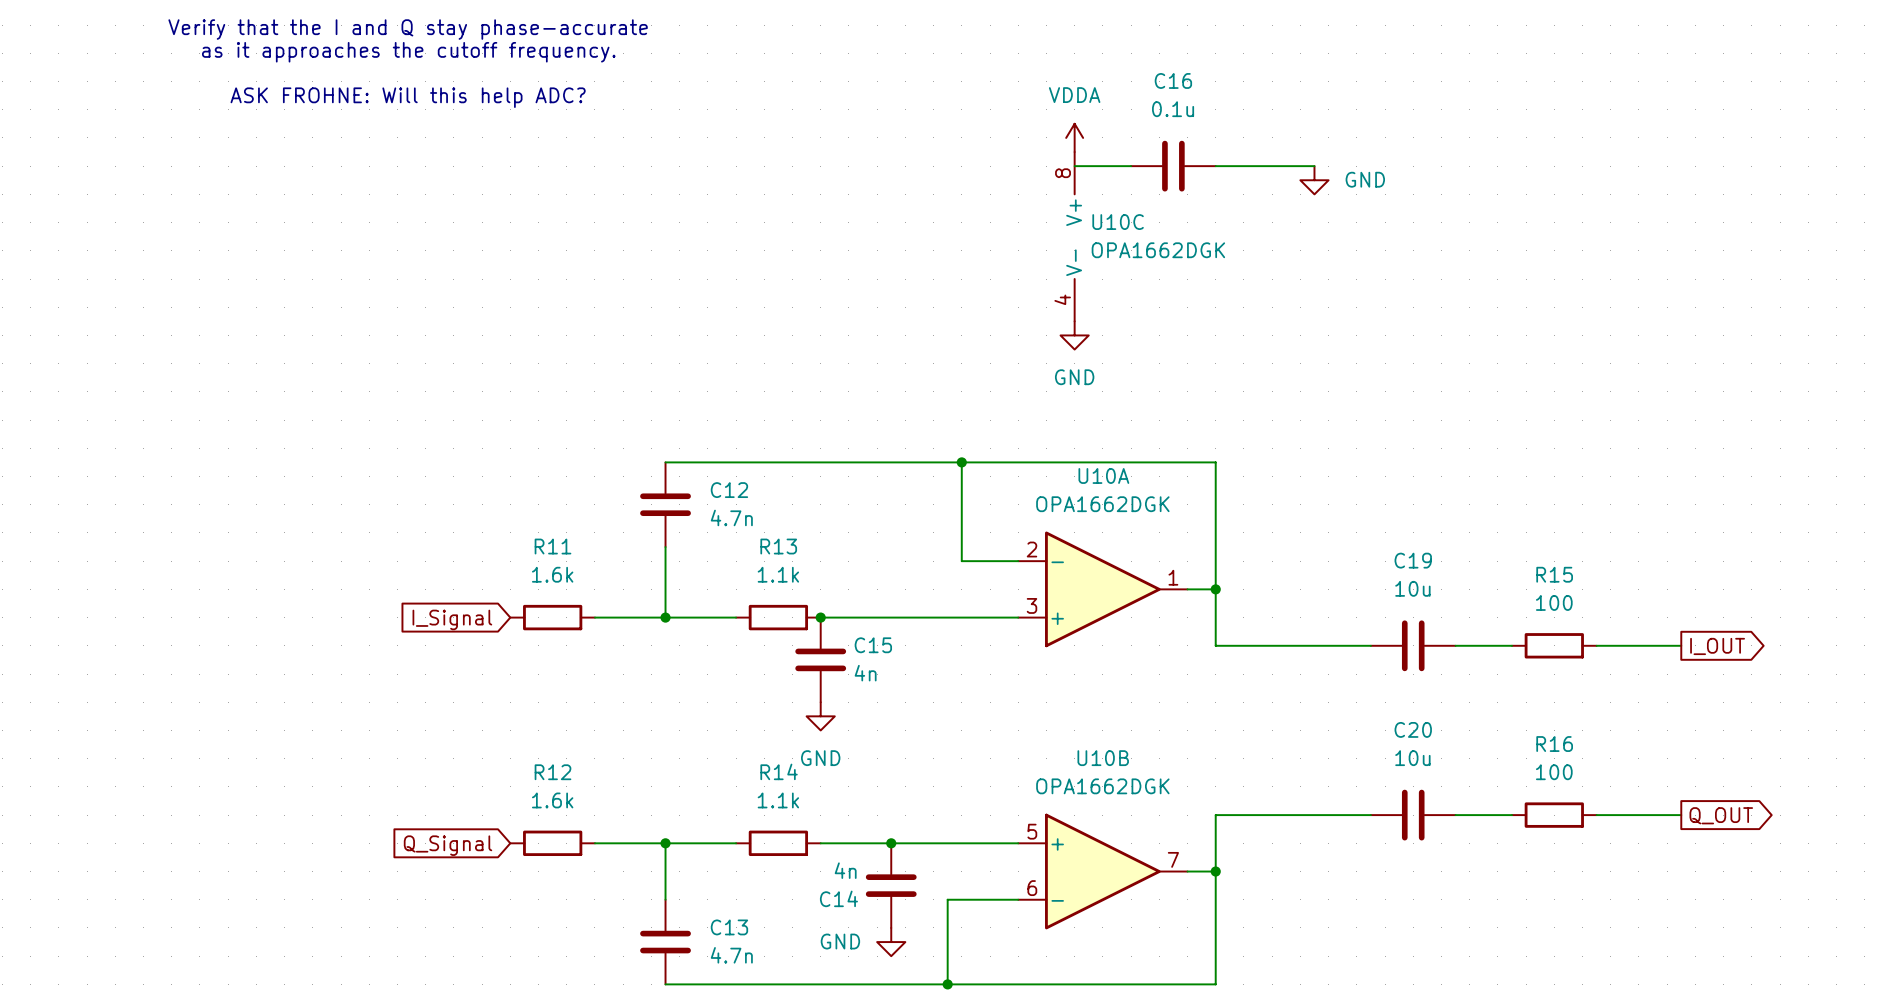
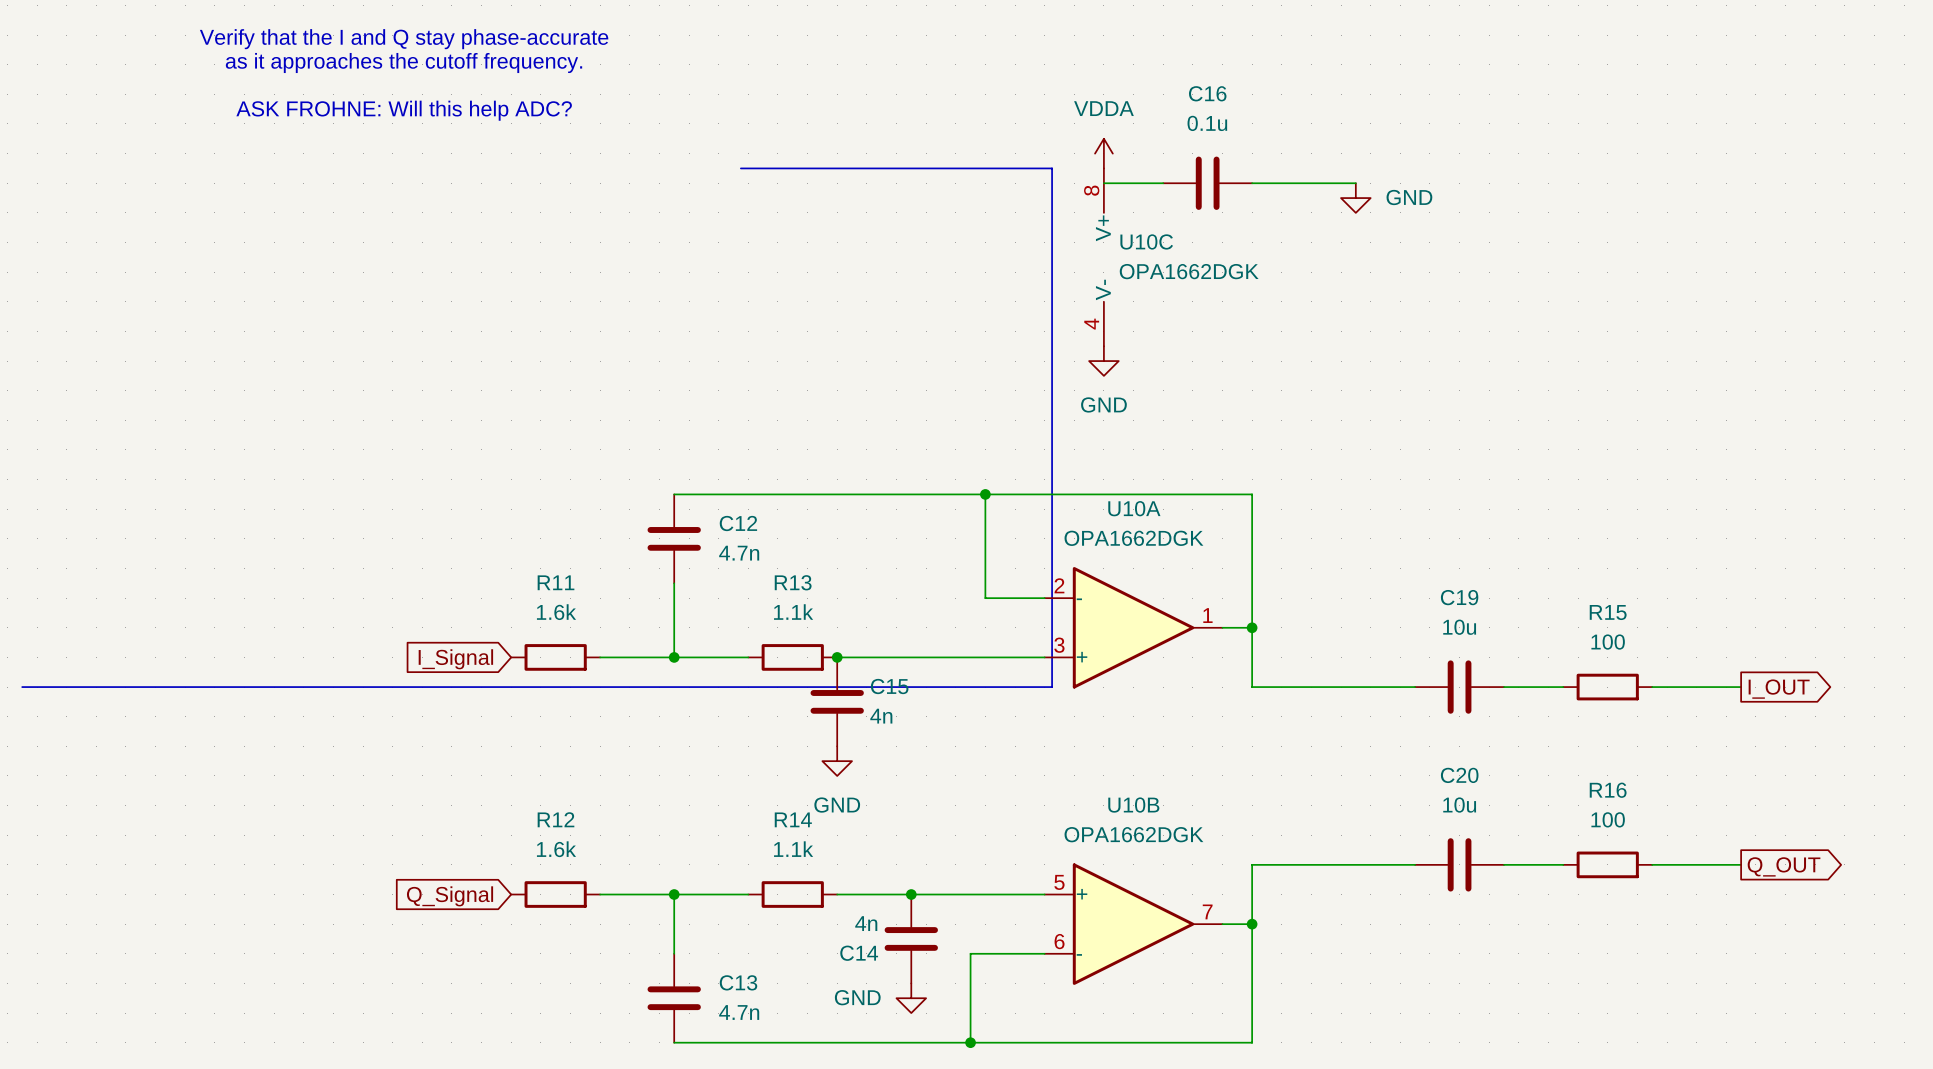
line: none -> (740, 168) (1052, 168) (1052, 687) (22, 687)

